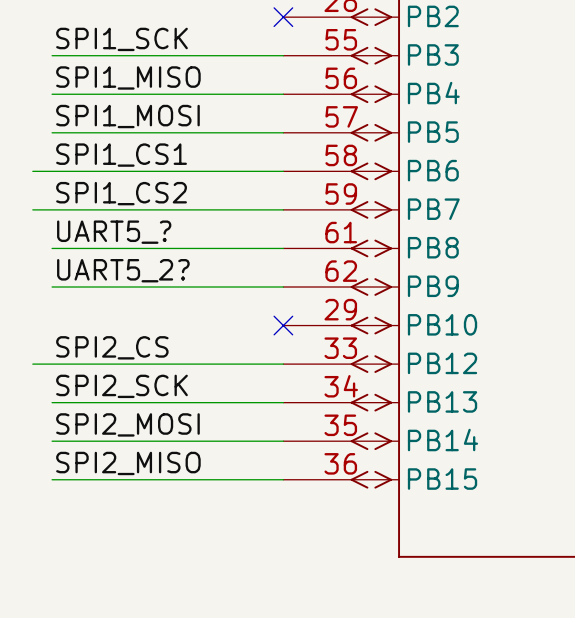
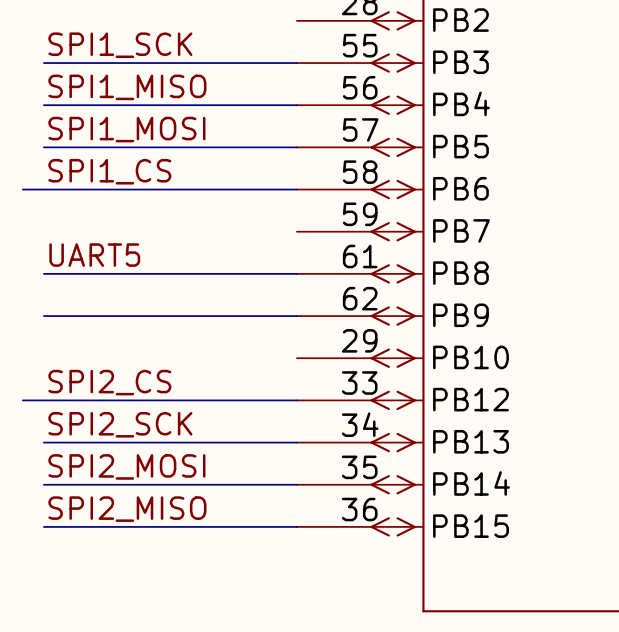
no-connect mark: (283, 17) -> none
label: SPI1_CS1 (121, 155) -> SPI1_CS (109, 171)
label: SPI1_CS2 (121, 193) -> none
wire: (32, 209) (283, 209) -> none
label: UART5_? (114, 232) -> UART5 (94, 255)
label: UART5_2? (123, 270) -> none
no-connect mark: (283, 325) -> none

